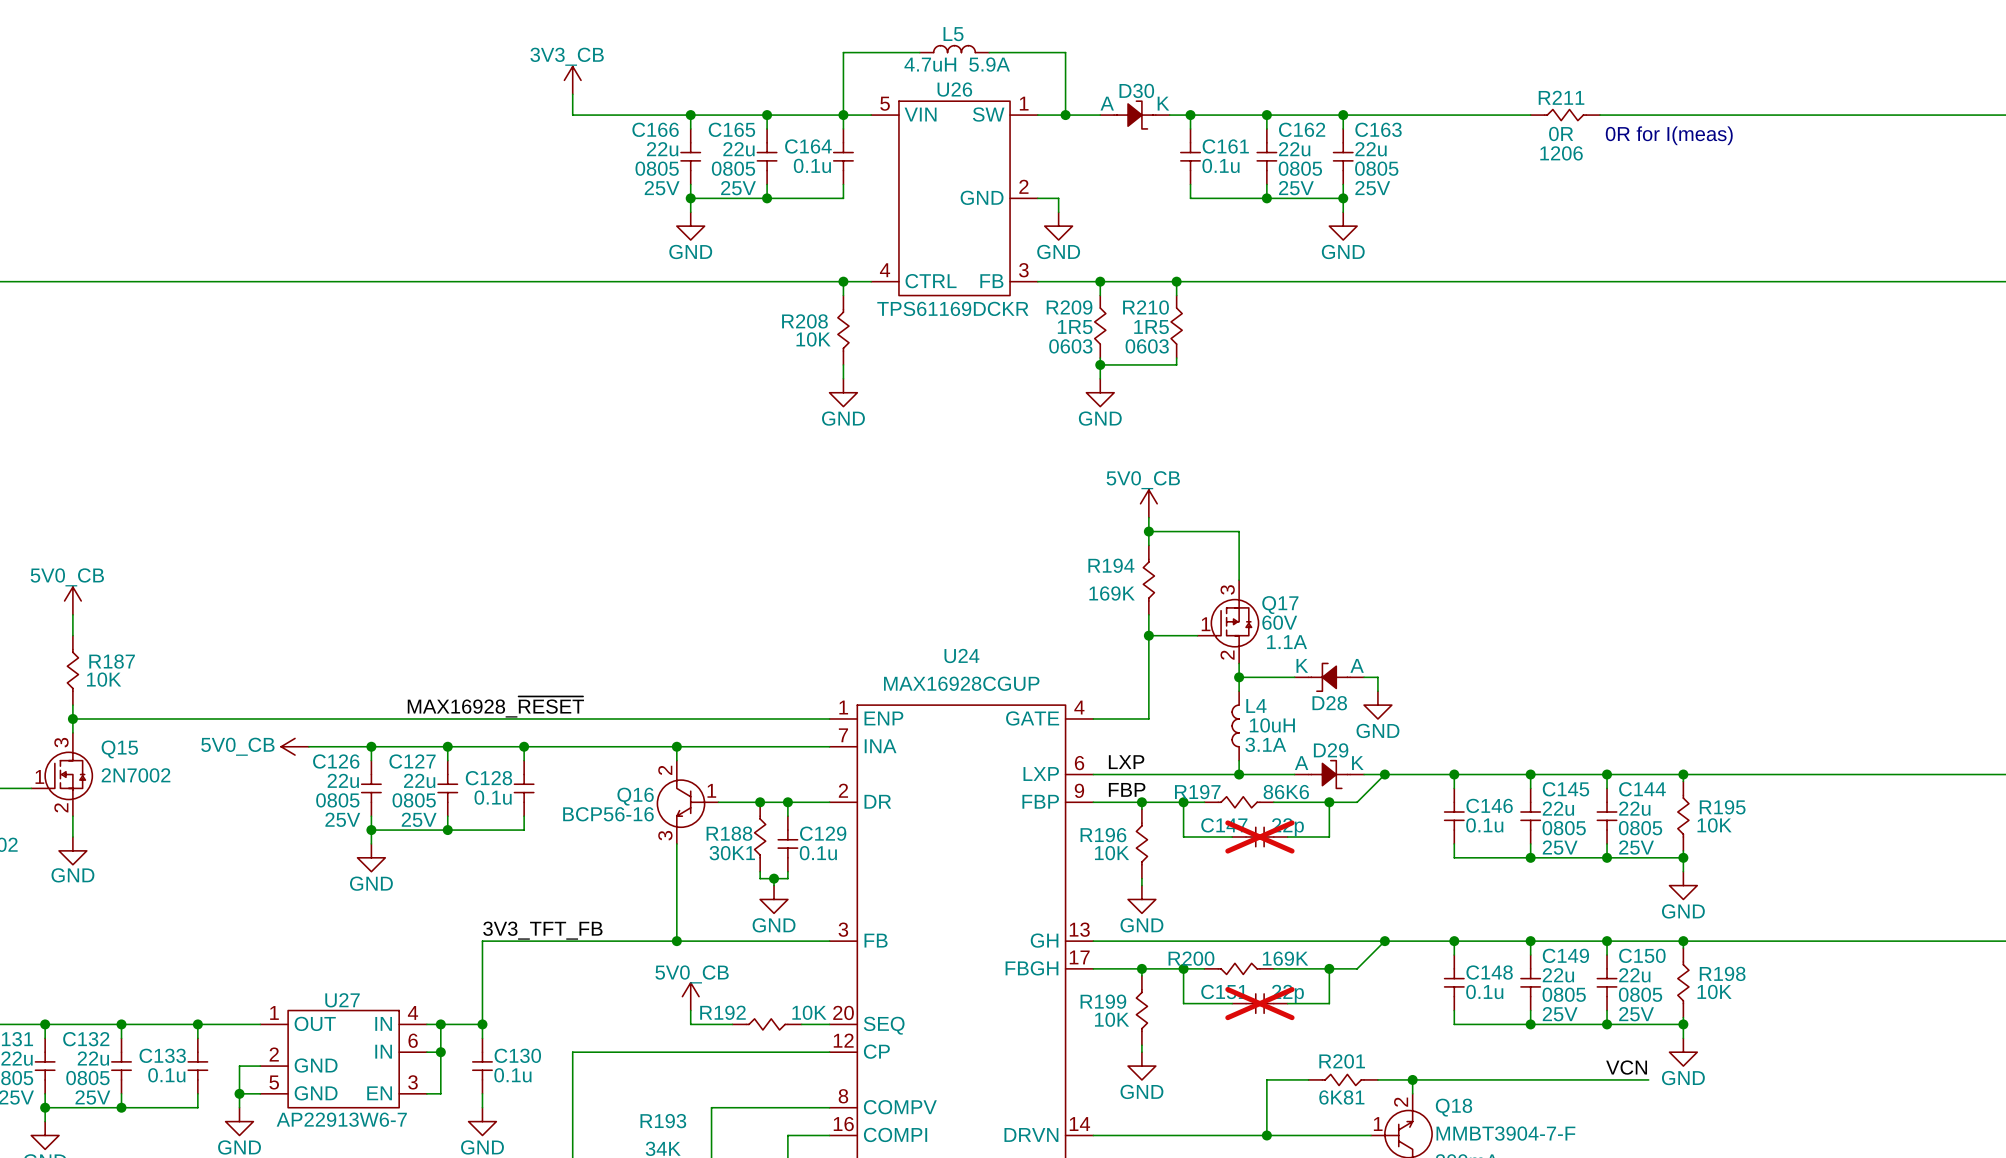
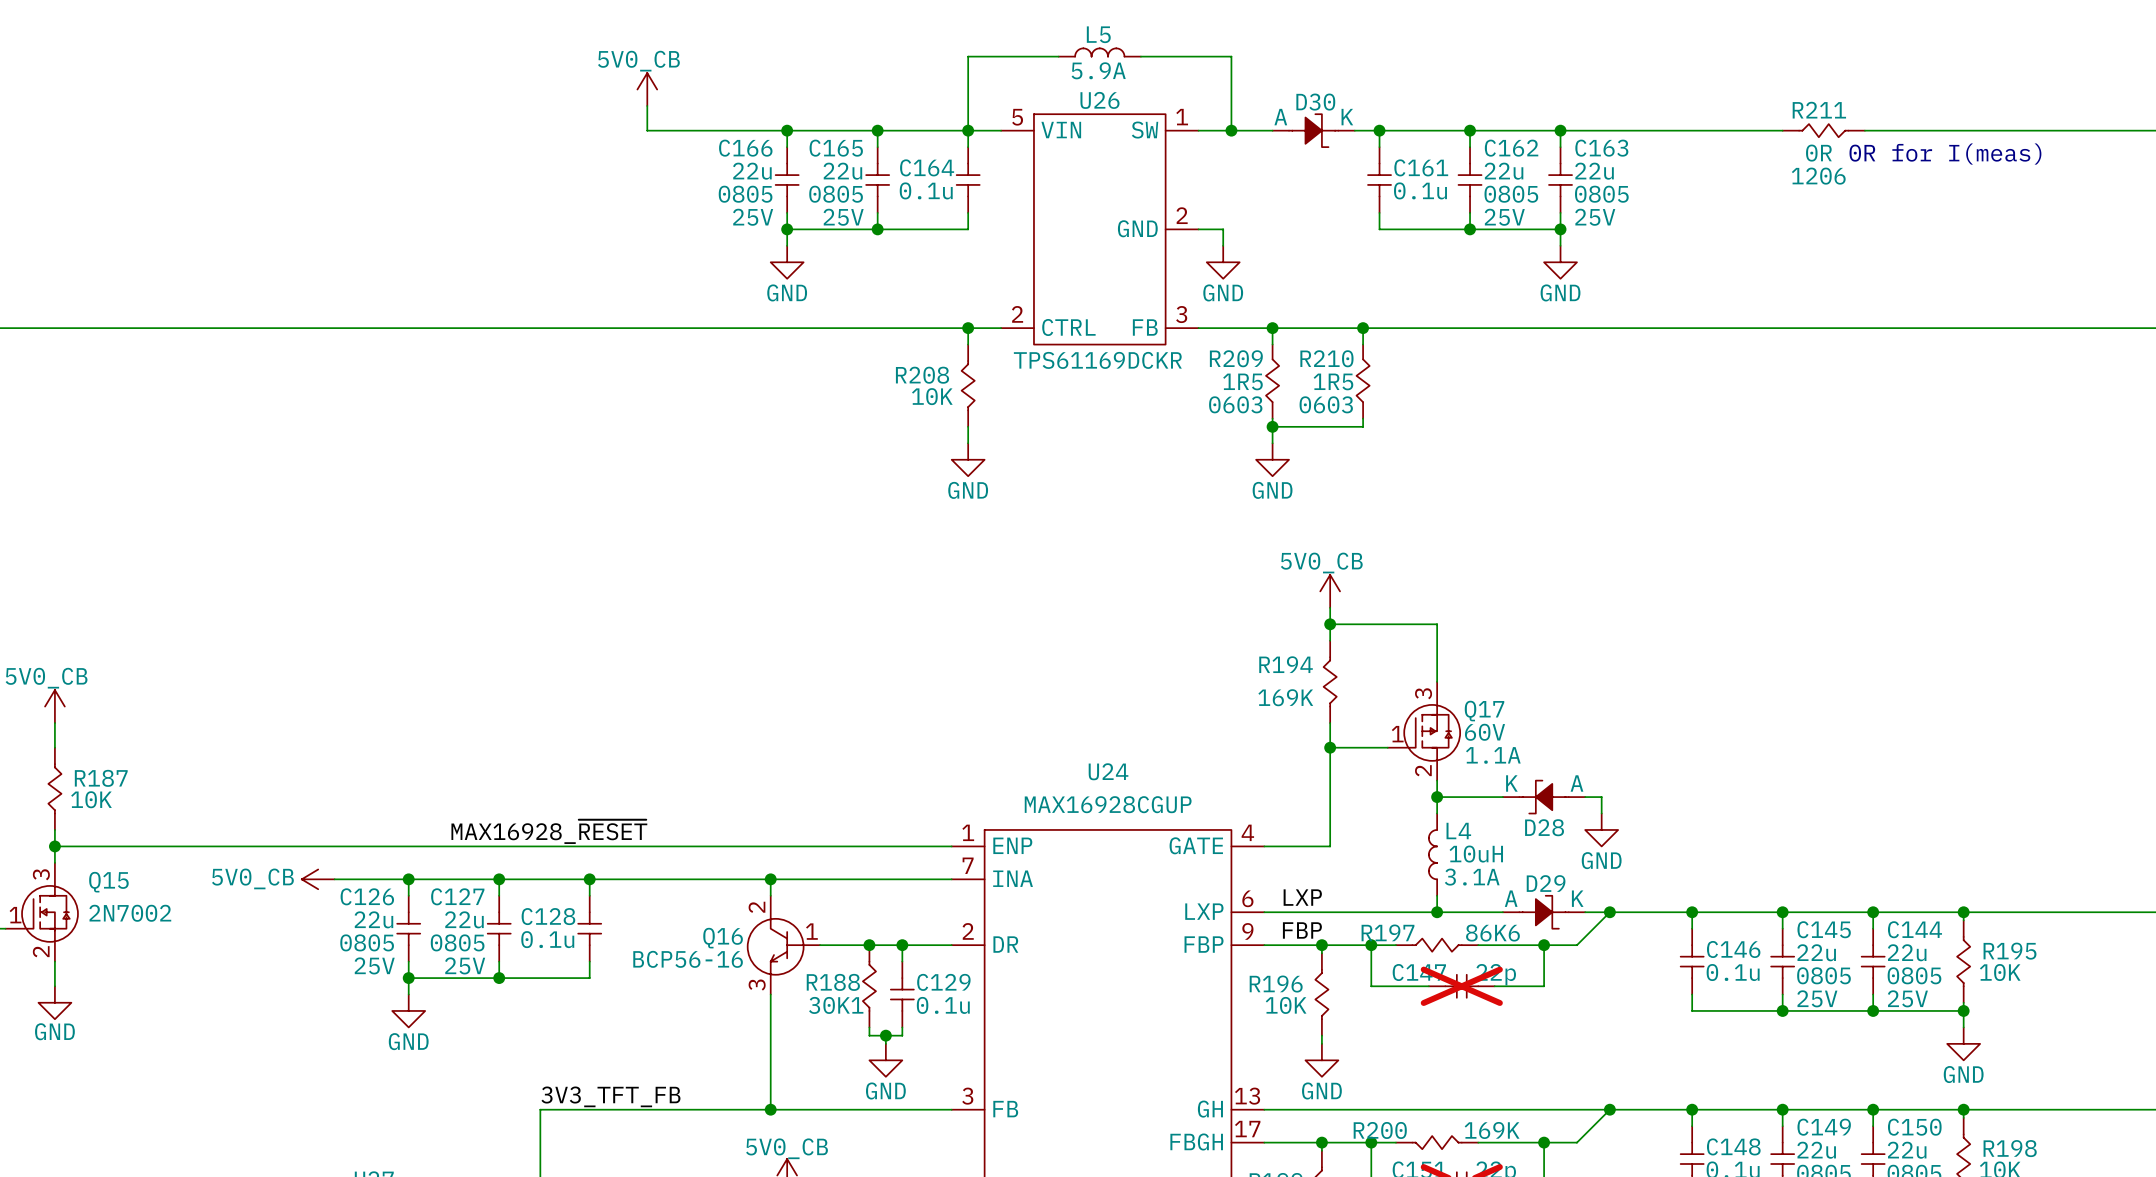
L5 text: 4.7uH (930, 64) -> none
L5 text position: 5.9A (989, 64) -> 5.9A (1098, 70)
power symbol: 3V3_CB (572, 80) -> 5V0_CB (647, 89)
U26 pin number: 4 (885, 270) -> 2 (1017, 314)

